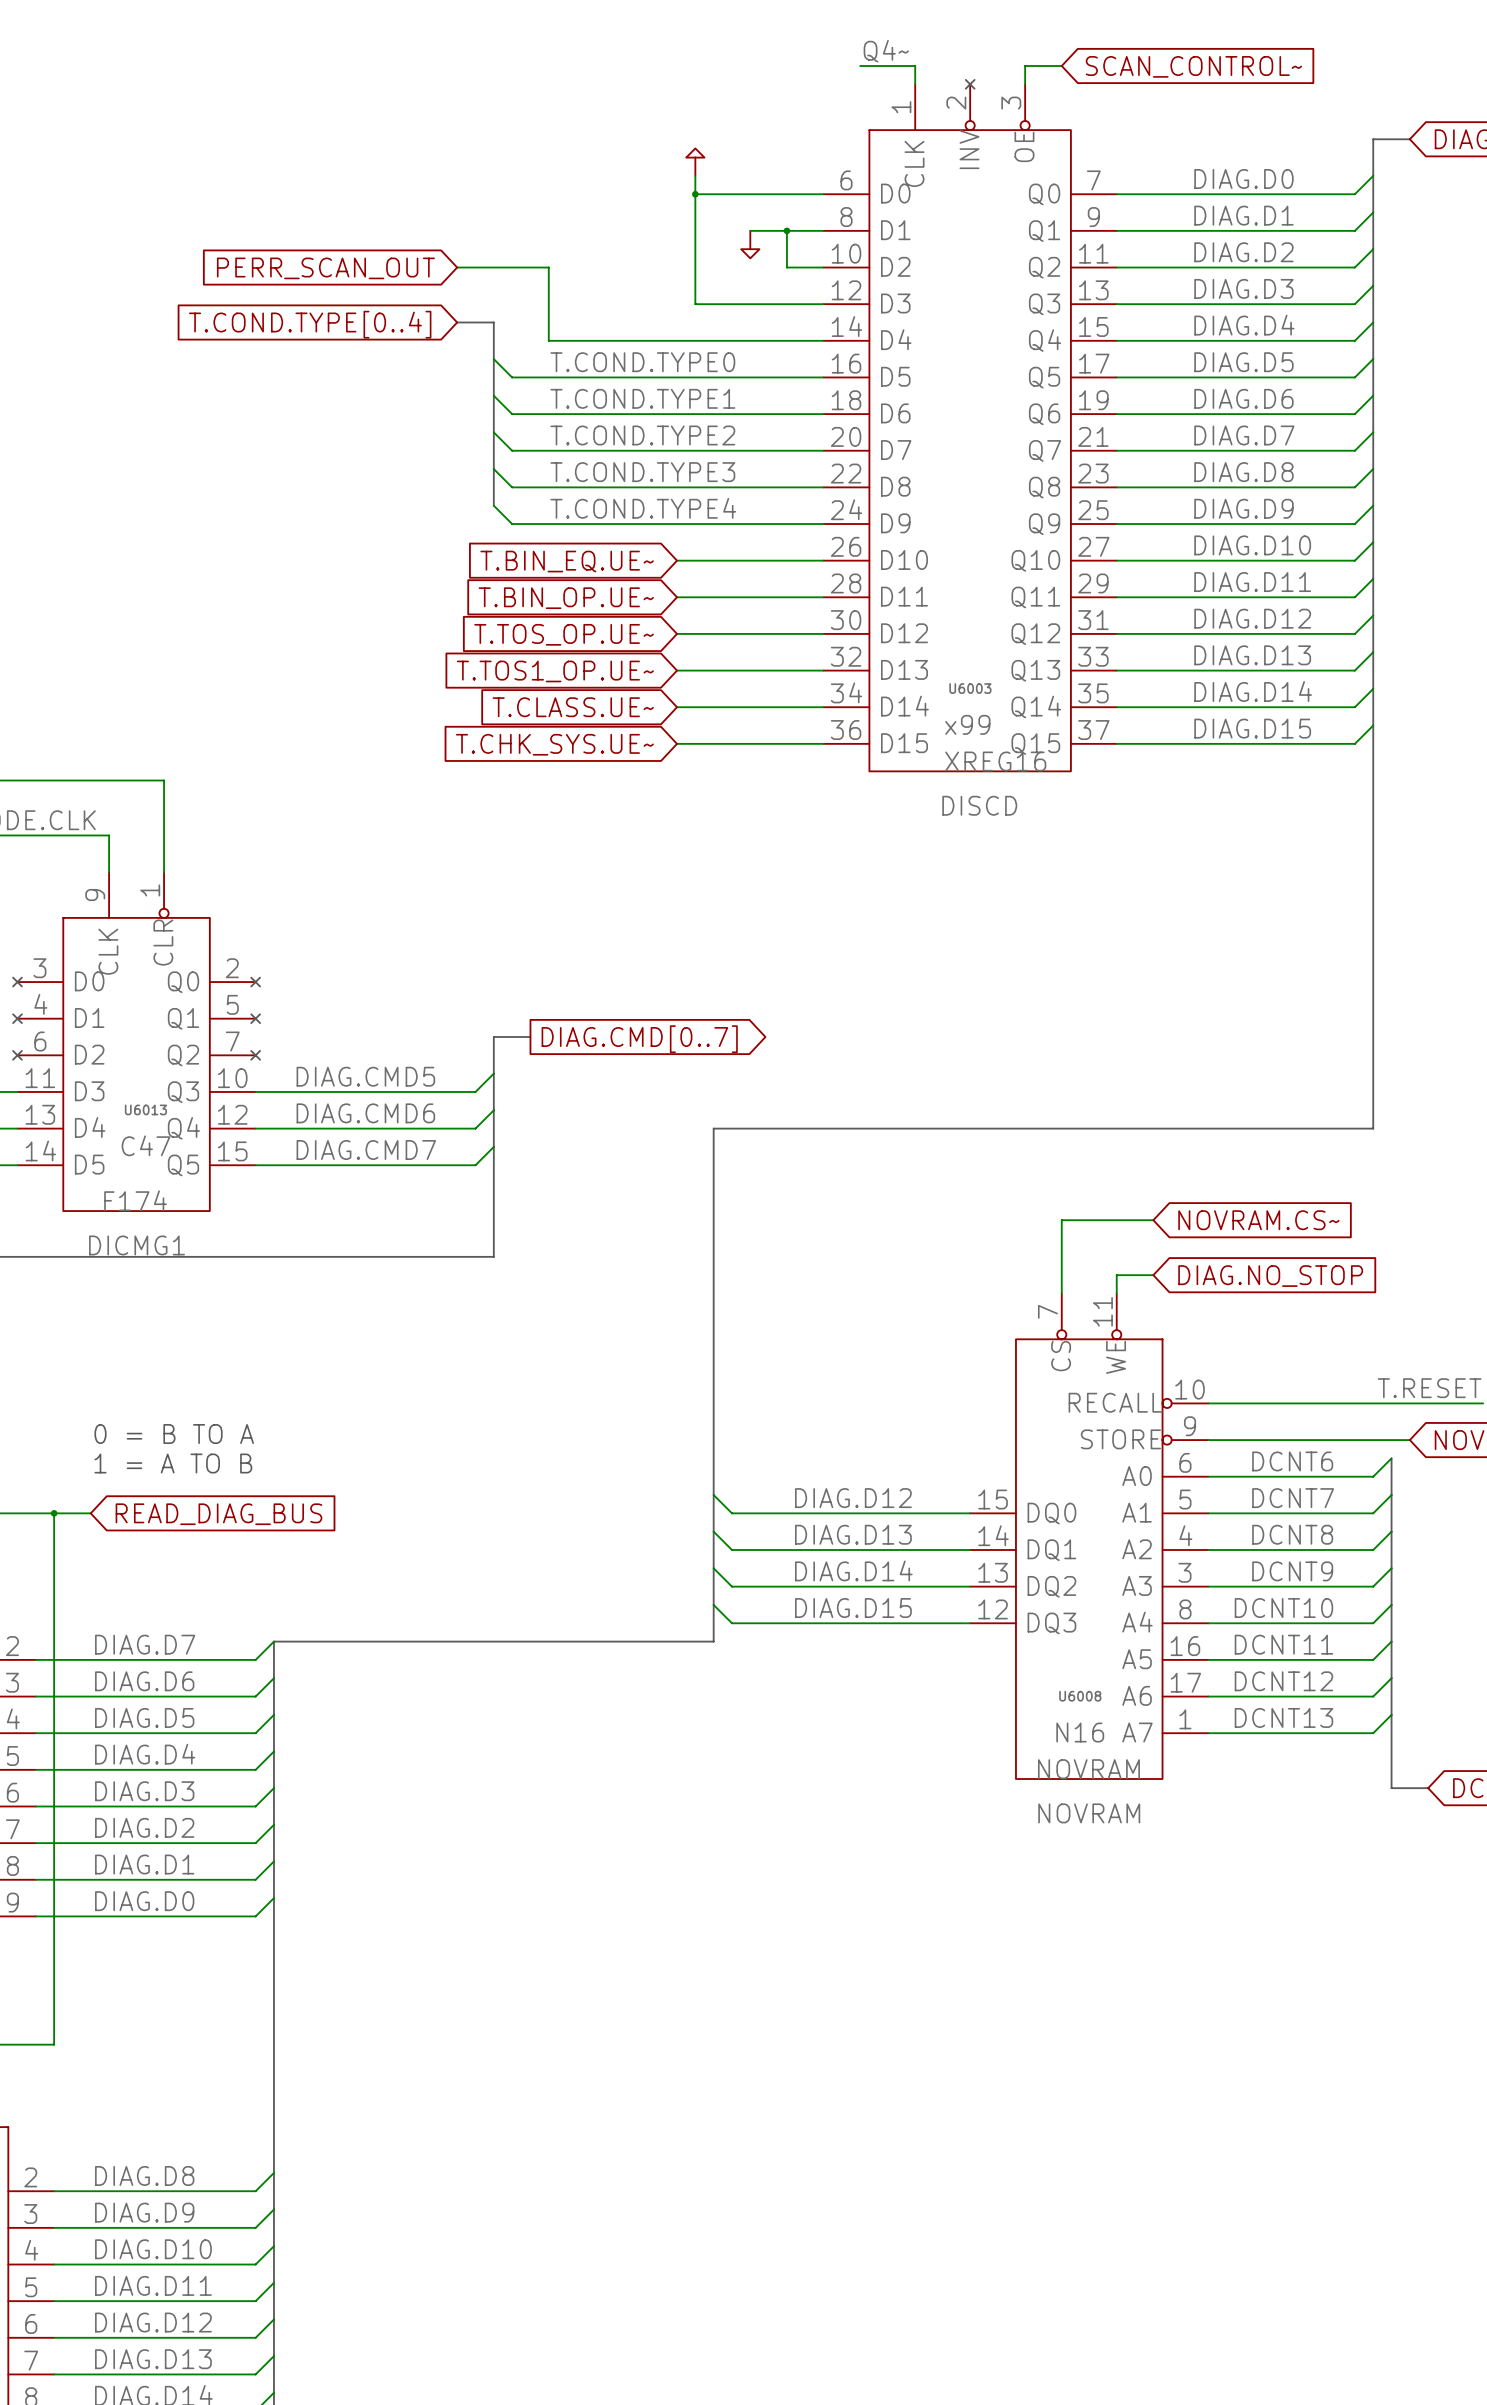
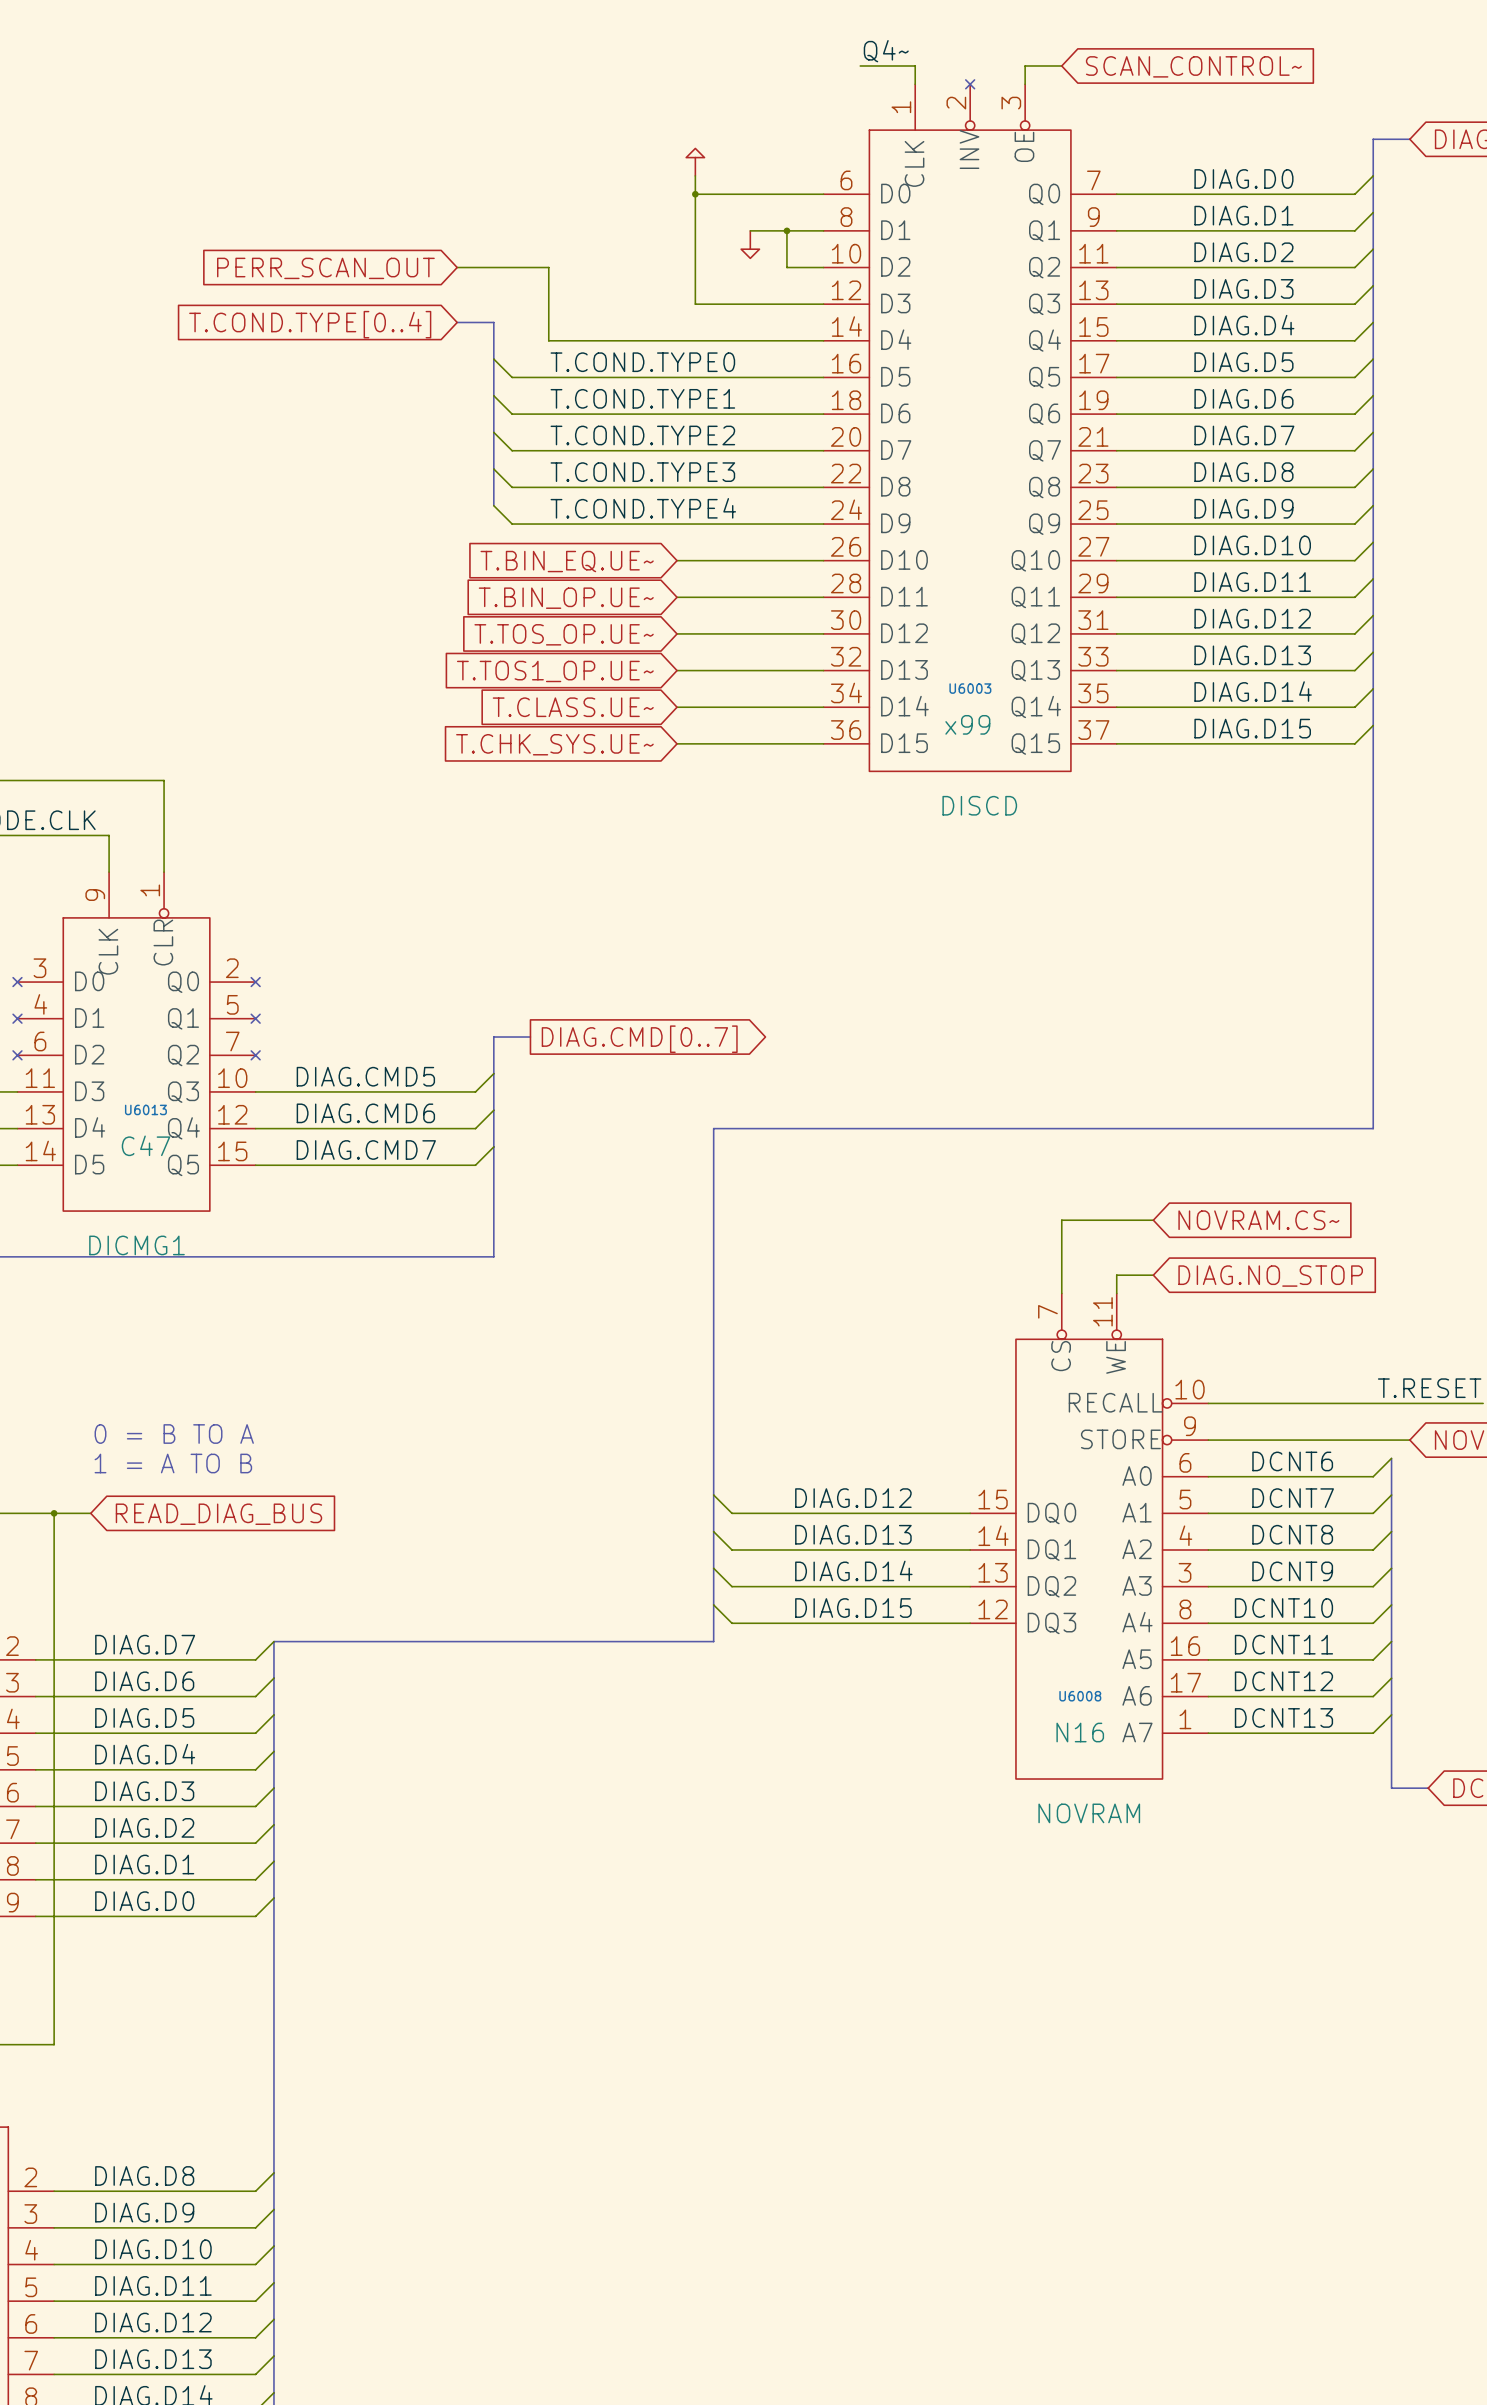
U6003 value: XREG16 (995, 761) -> none
U6013 value: F174 (135, 1200) -> none
U6008 value: NOVRAM (1088, 1769) -> none

